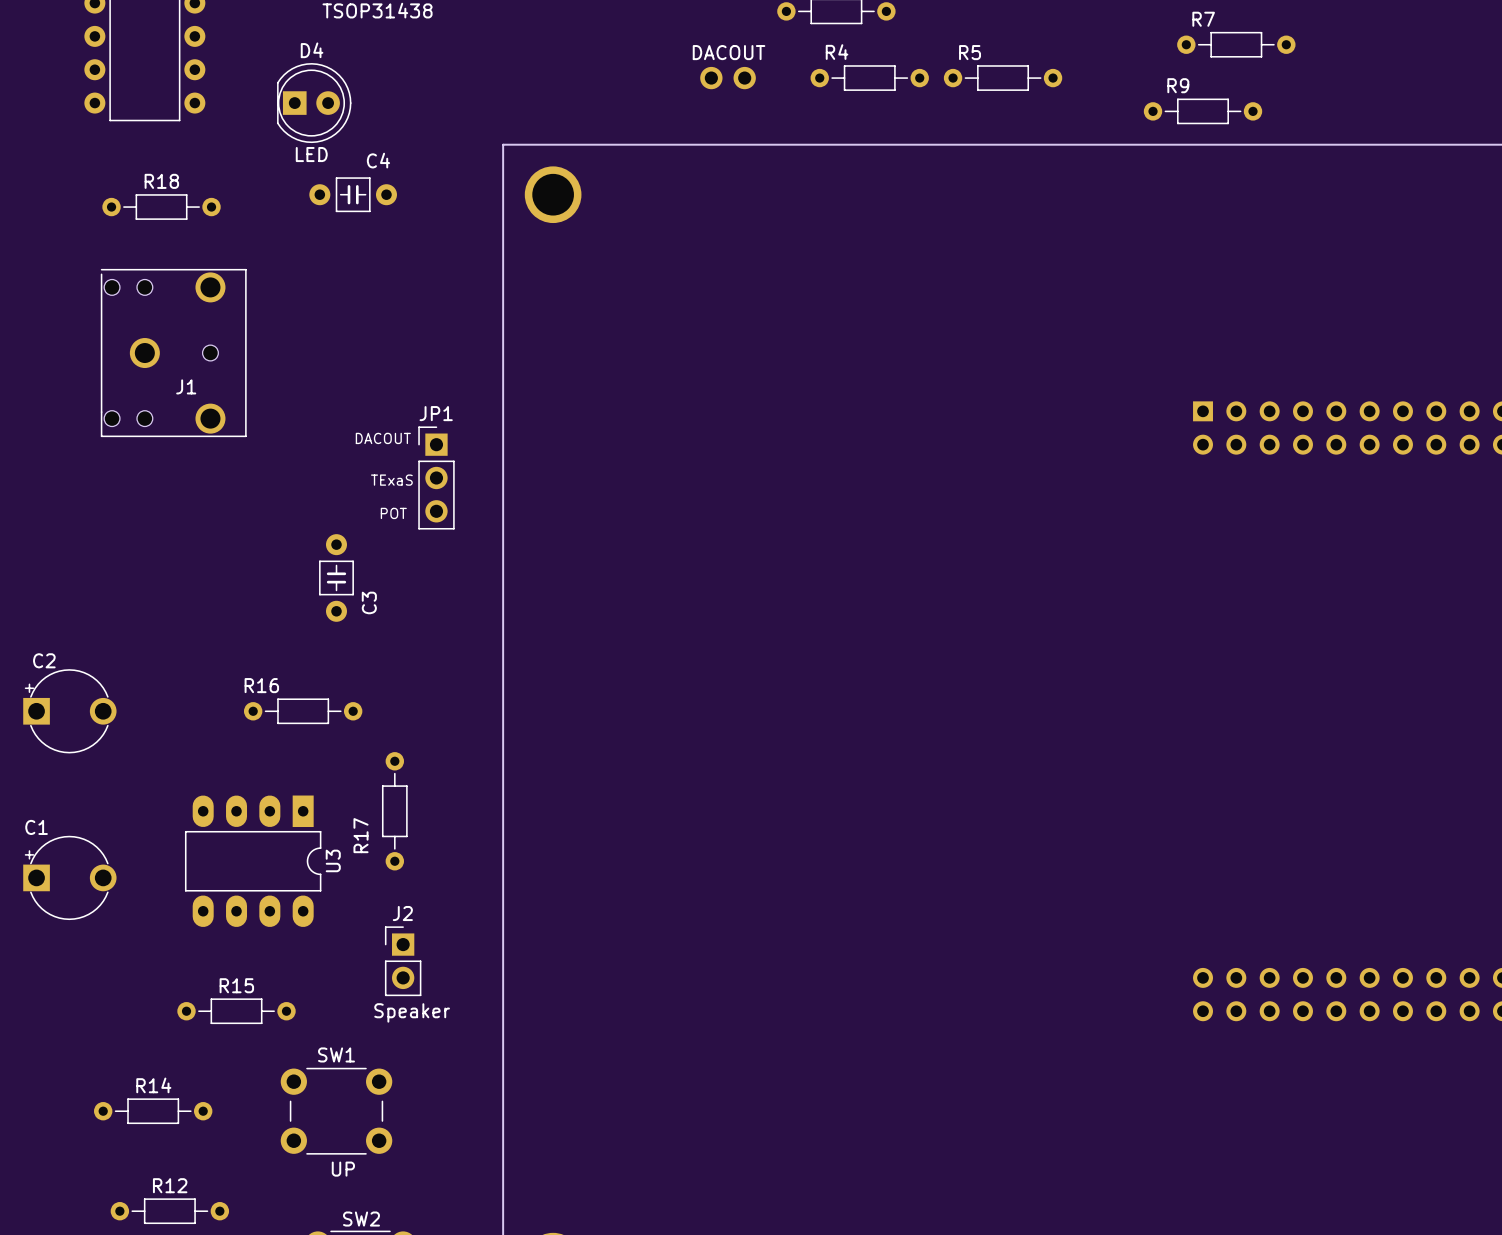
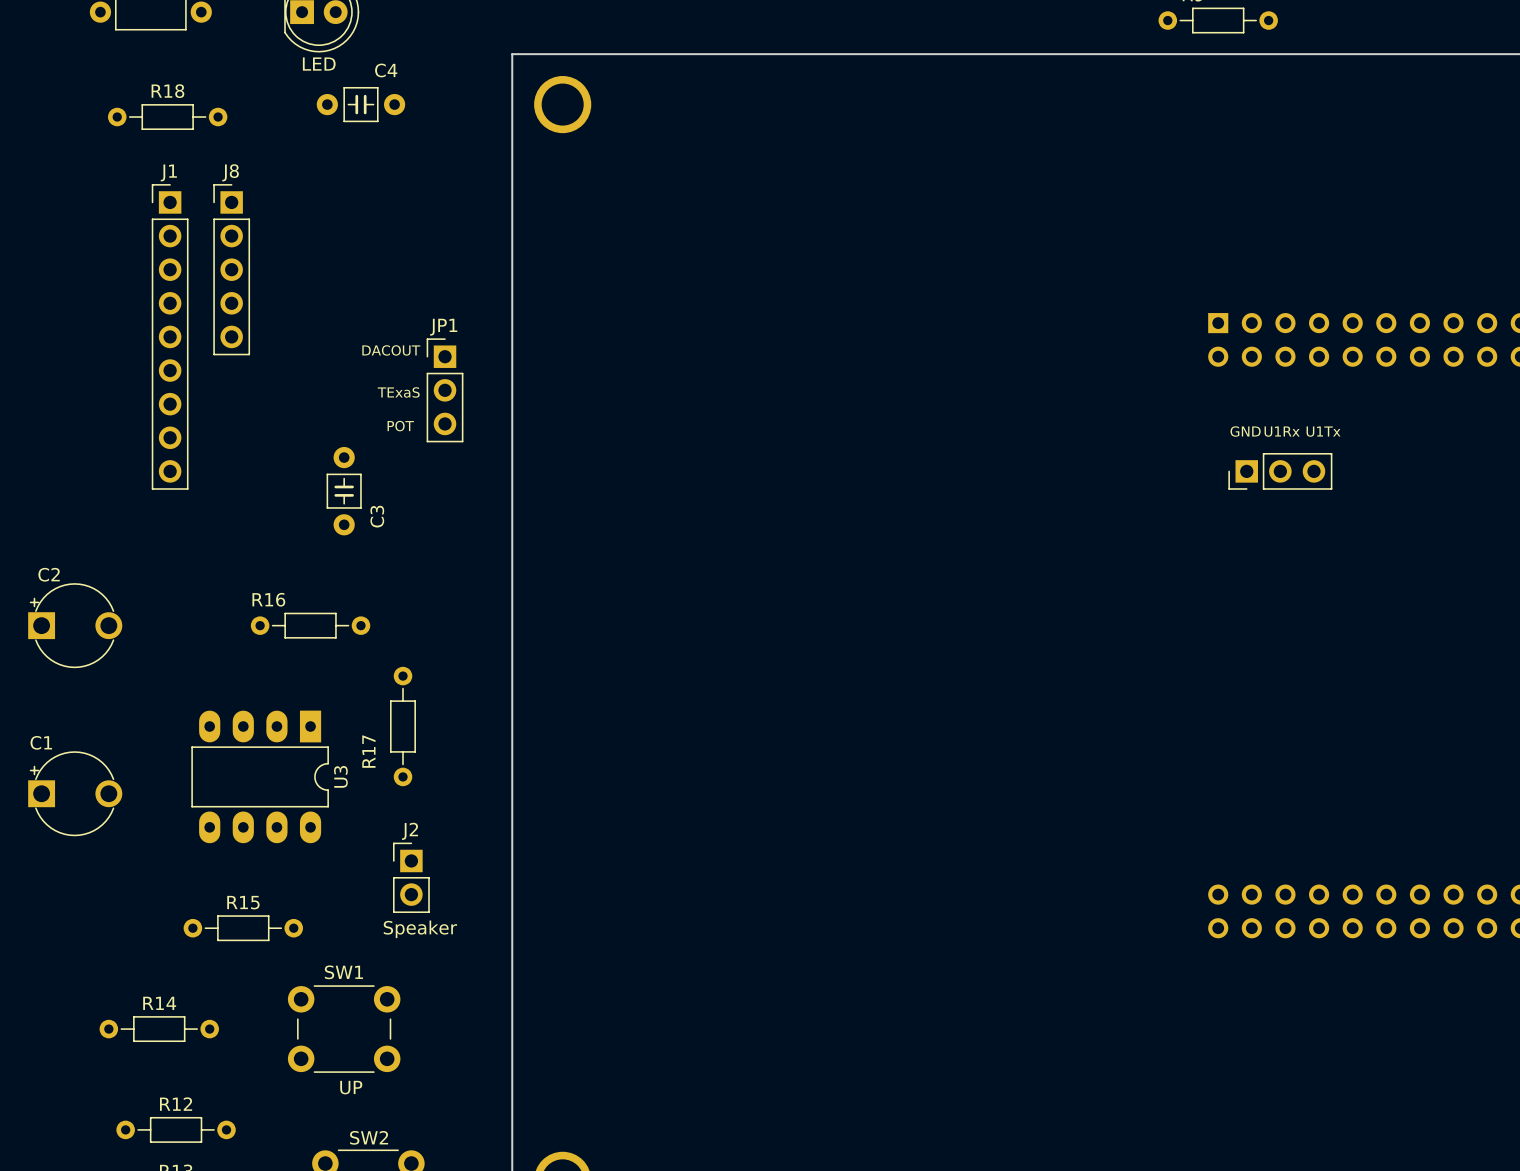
J1 footprint: [100, 268, 247, 438] -> [151, 184, 189, 490]
J8: none -> (231, 269)
J1 name position: J1 (186, 386) -> J1 (168, 172)
text: none -> GND (1245, 431)
text: none -> U1Rx (1282, 431)
text: none -> U1Tx (1323, 431)
part: none -> (1280, 471)

